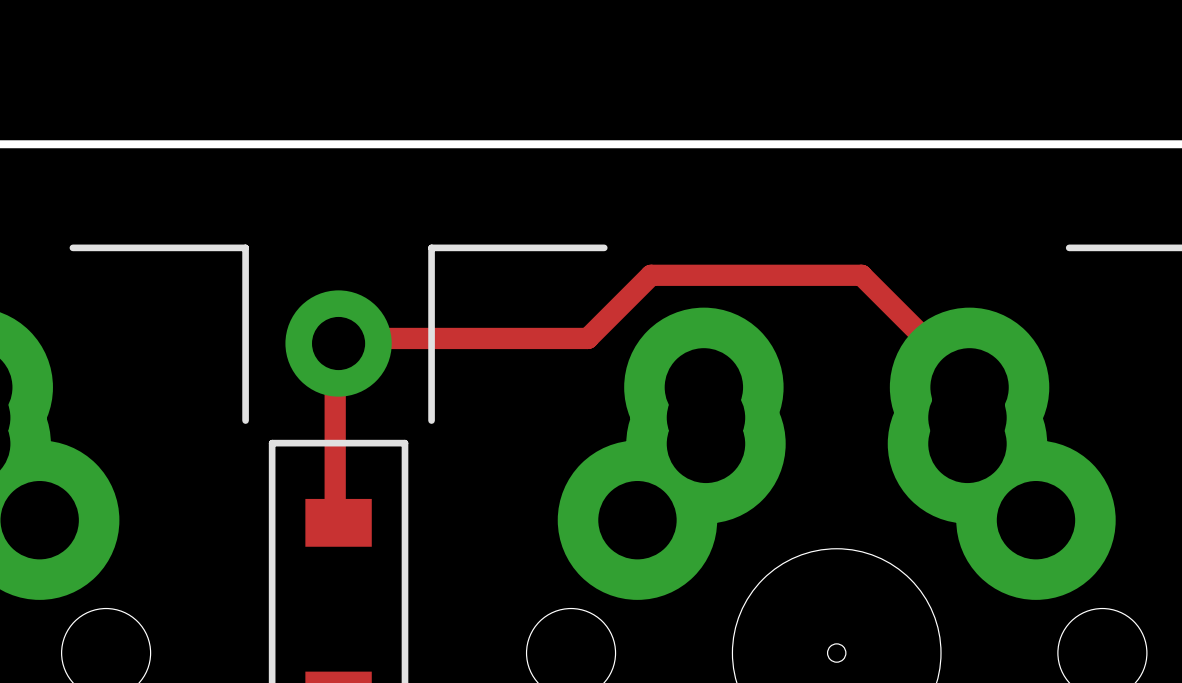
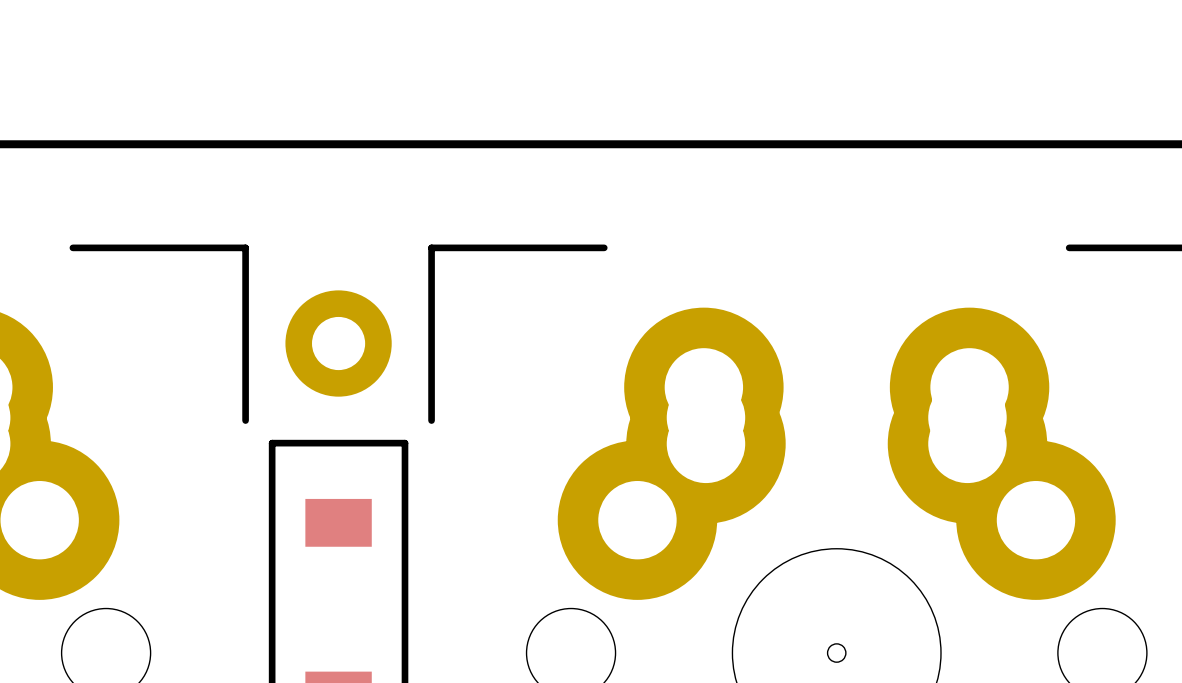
track: (967, 443) (966, 380) (861, 275) (651, 275) (587, 338) (356, 338) (338, 343) (335, 359) (335, 506) (338, 522) -> none

